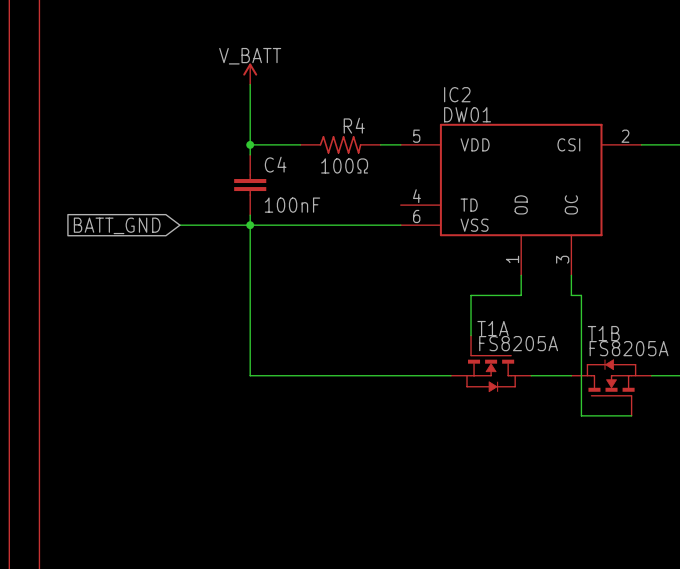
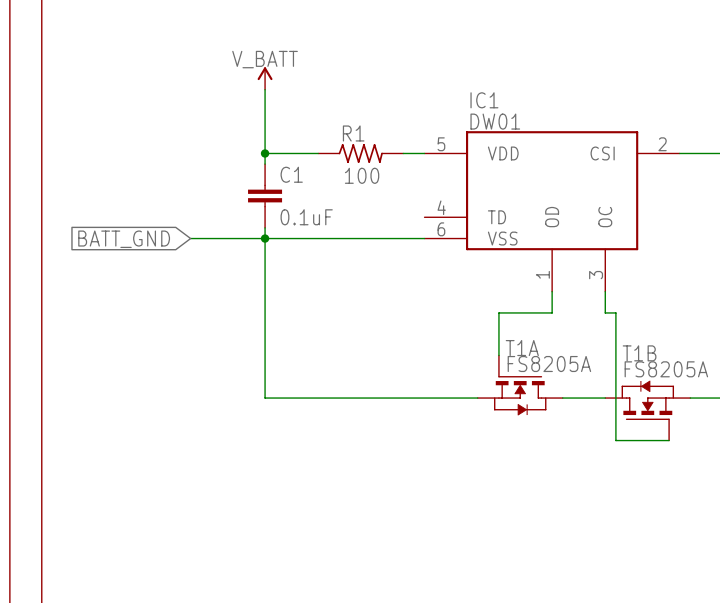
IC2 name: IC2 (457, 94) -> IC1 (484, 100)
R4 name: R4 (354, 125) -> R1 (353, 133)
C4 name: C4 (275, 164) -> C1 (291, 174)
R4 value: 100Ω (344, 165) -> 100 (362, 175)
C4 value: 100nF (292, 205) -> 0.1uF (306, 217)

